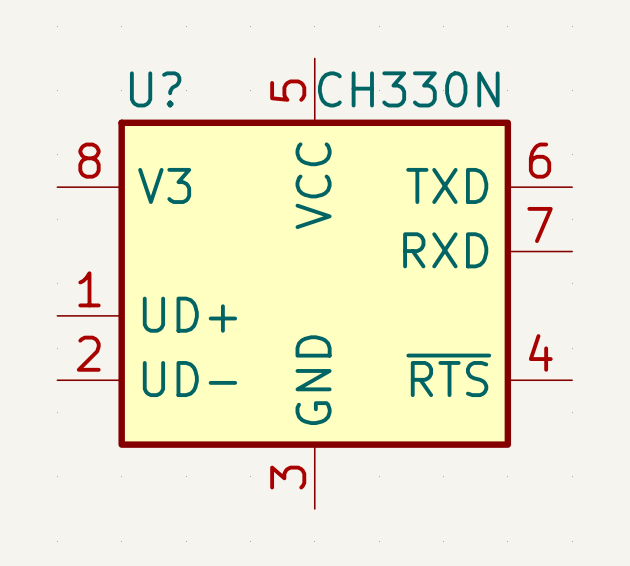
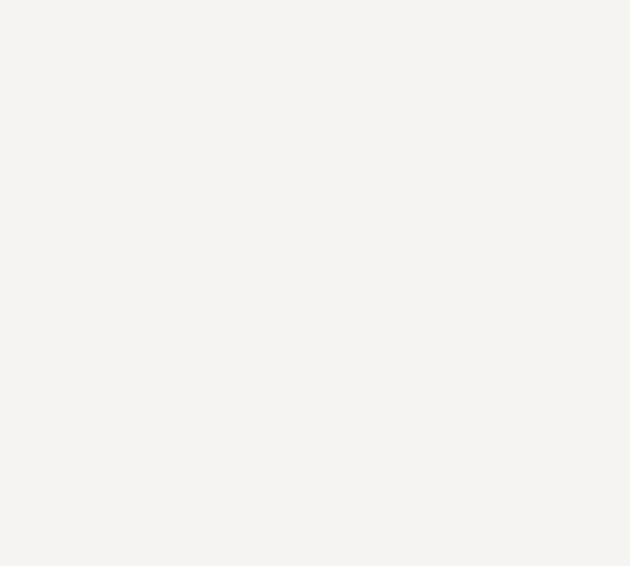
U?: CH330N (314, 283) -> none

